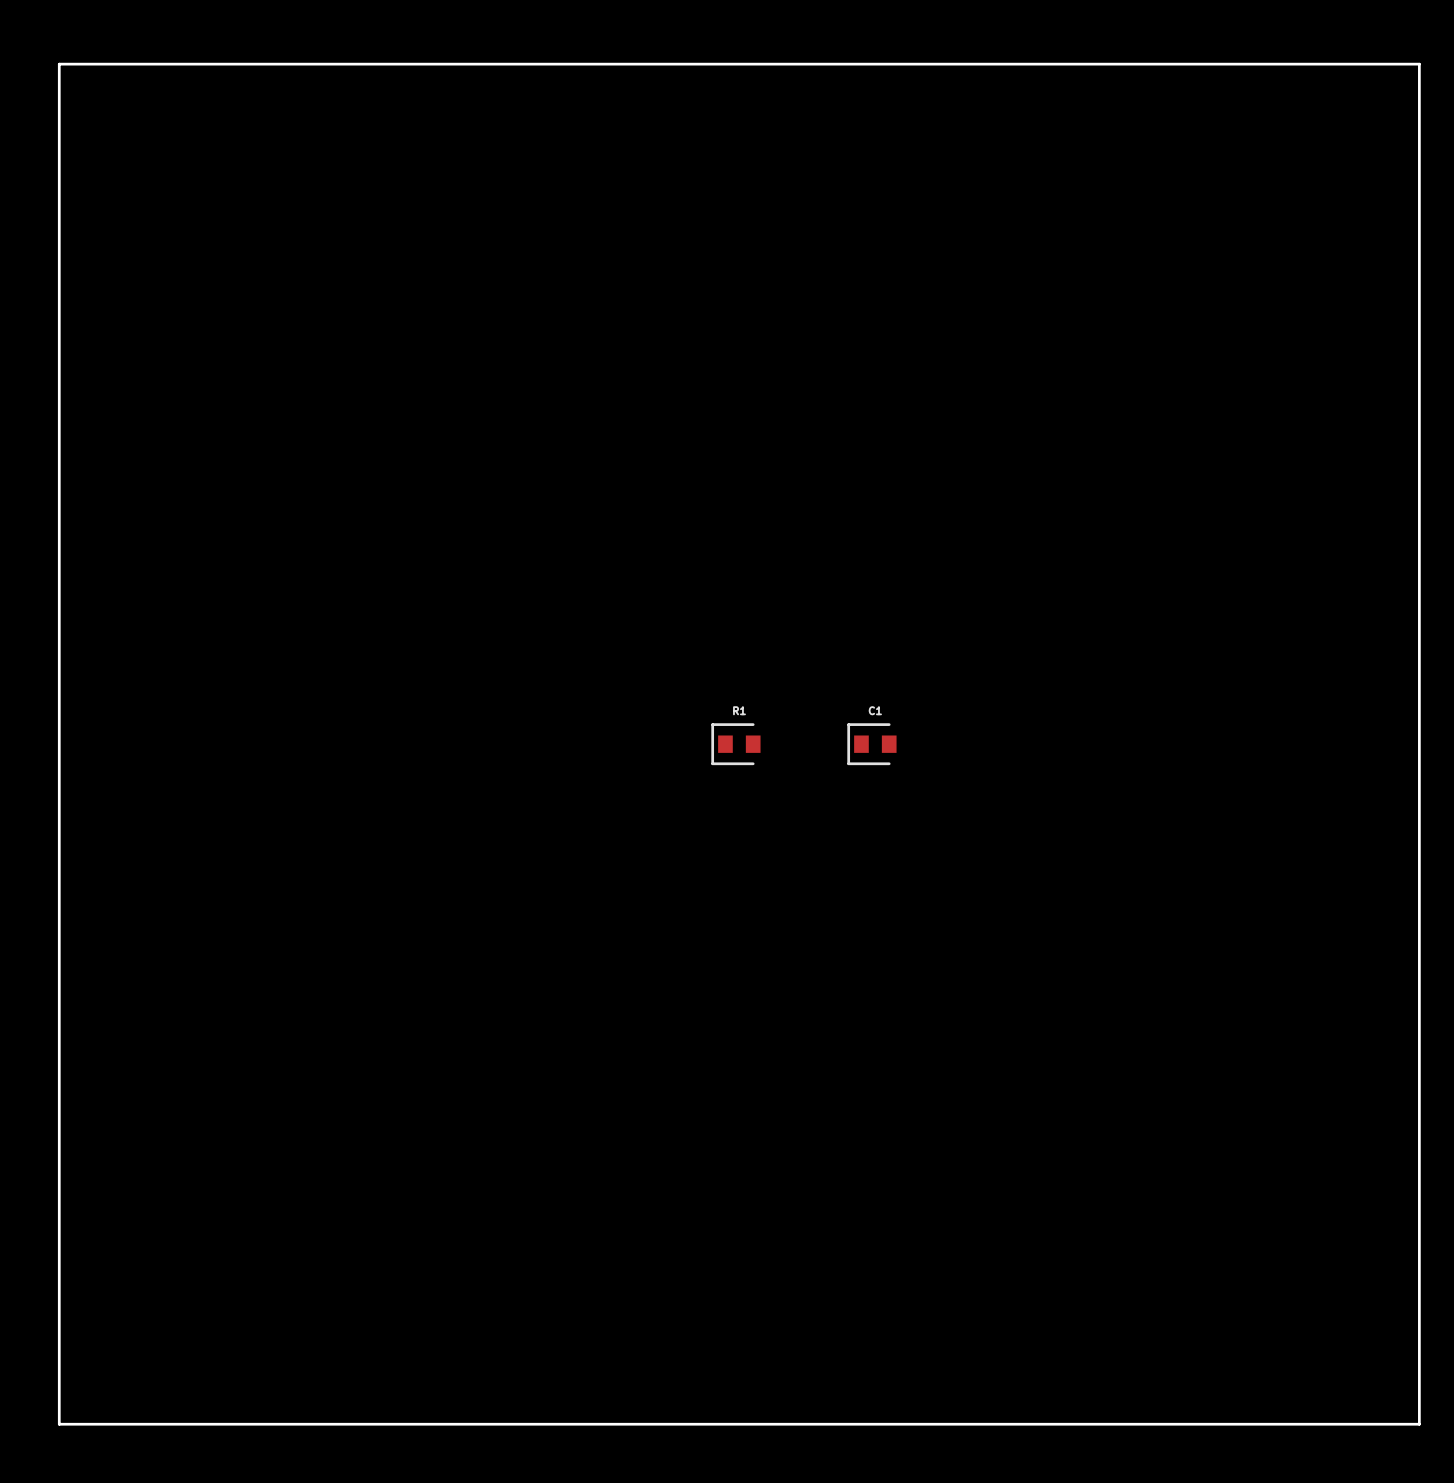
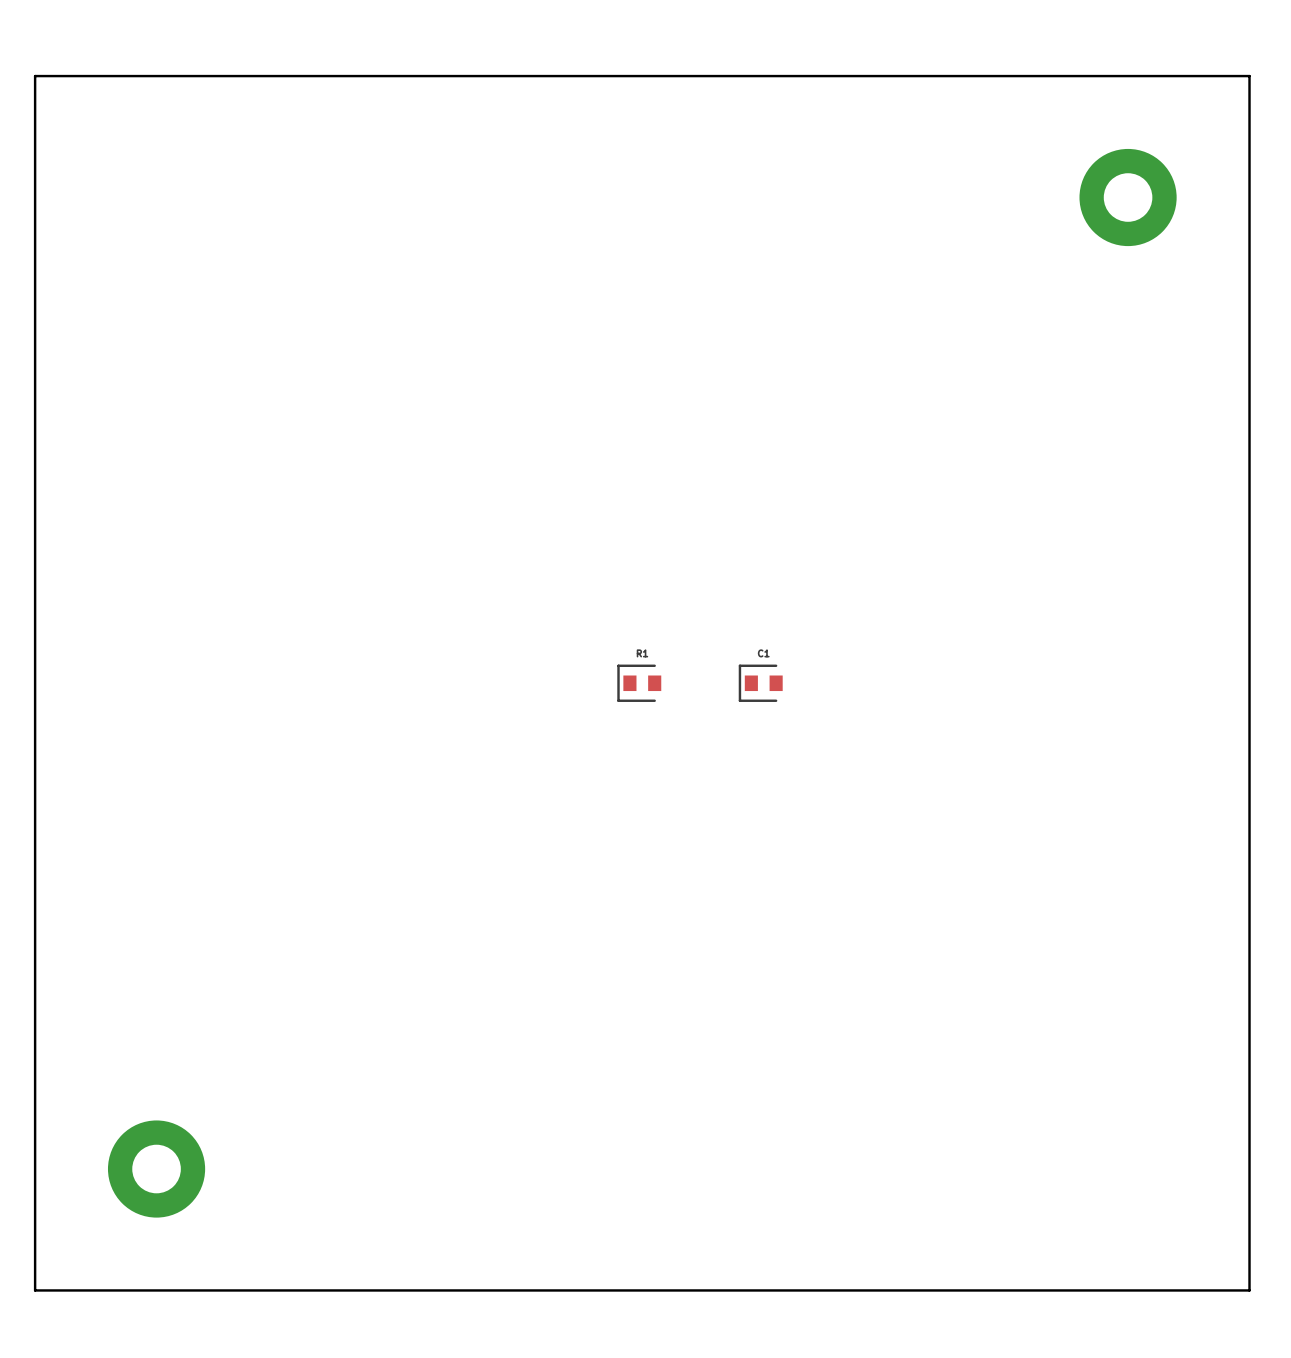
part: none -> (1128, 197)
part: none -> (156, 1169)

